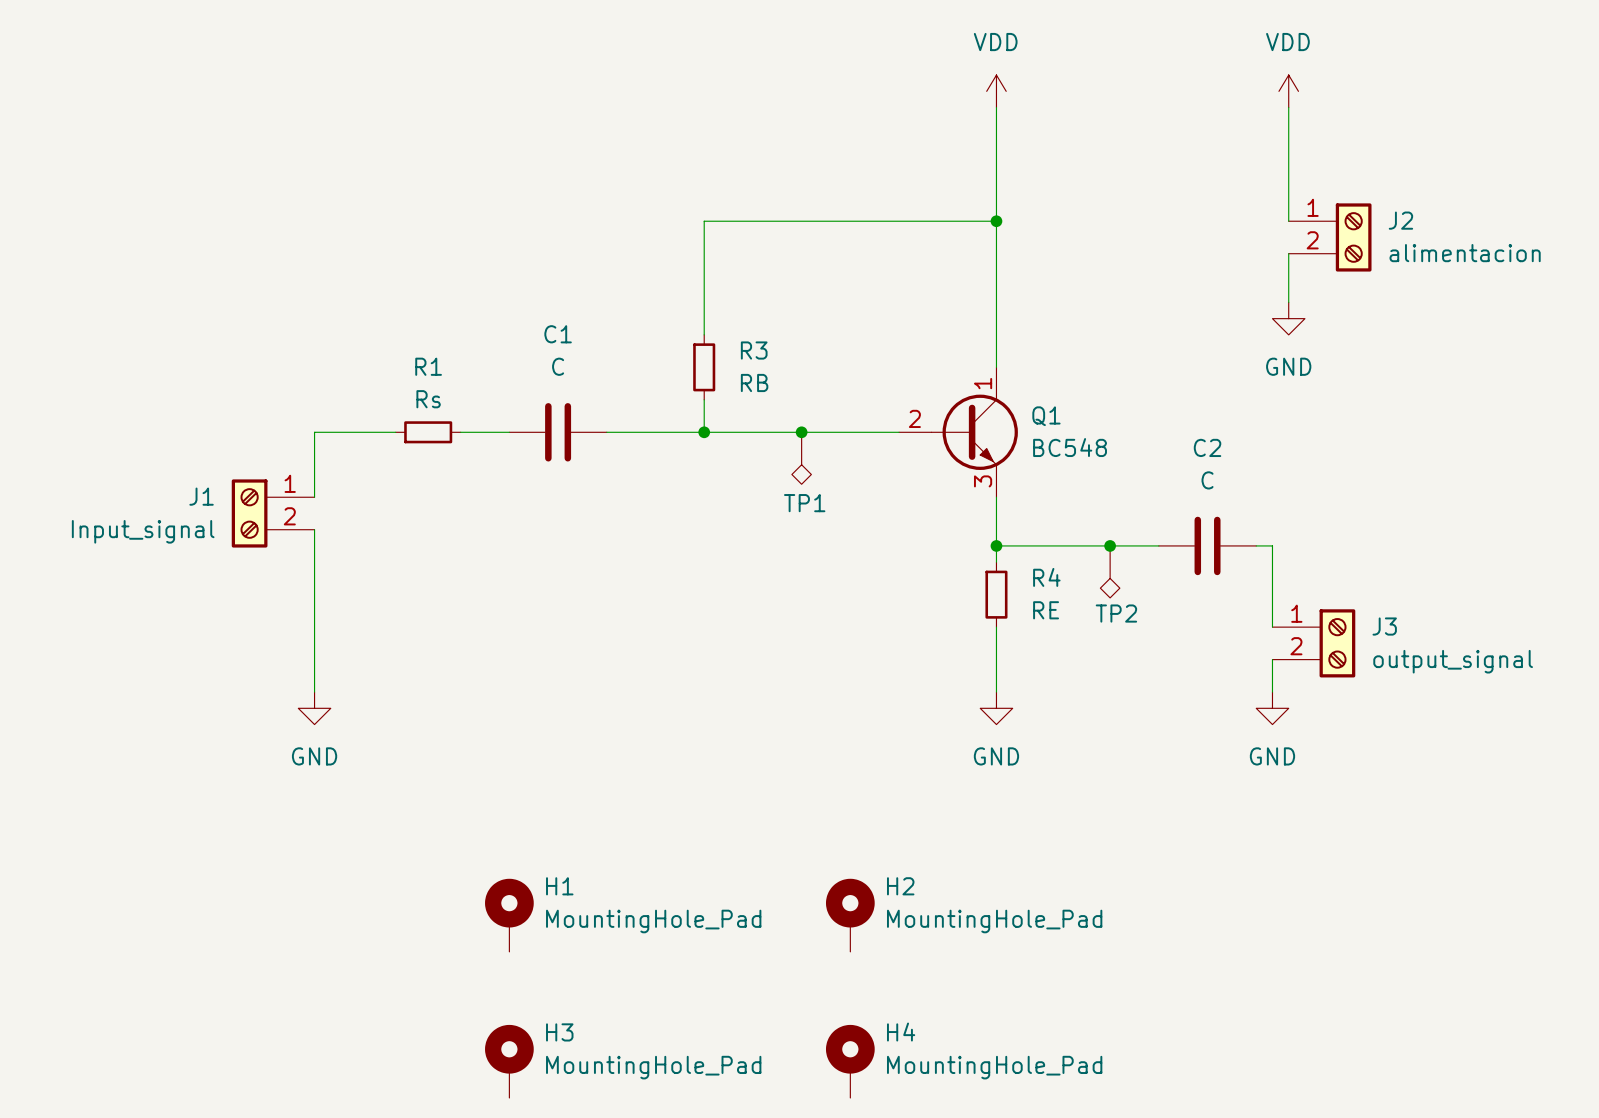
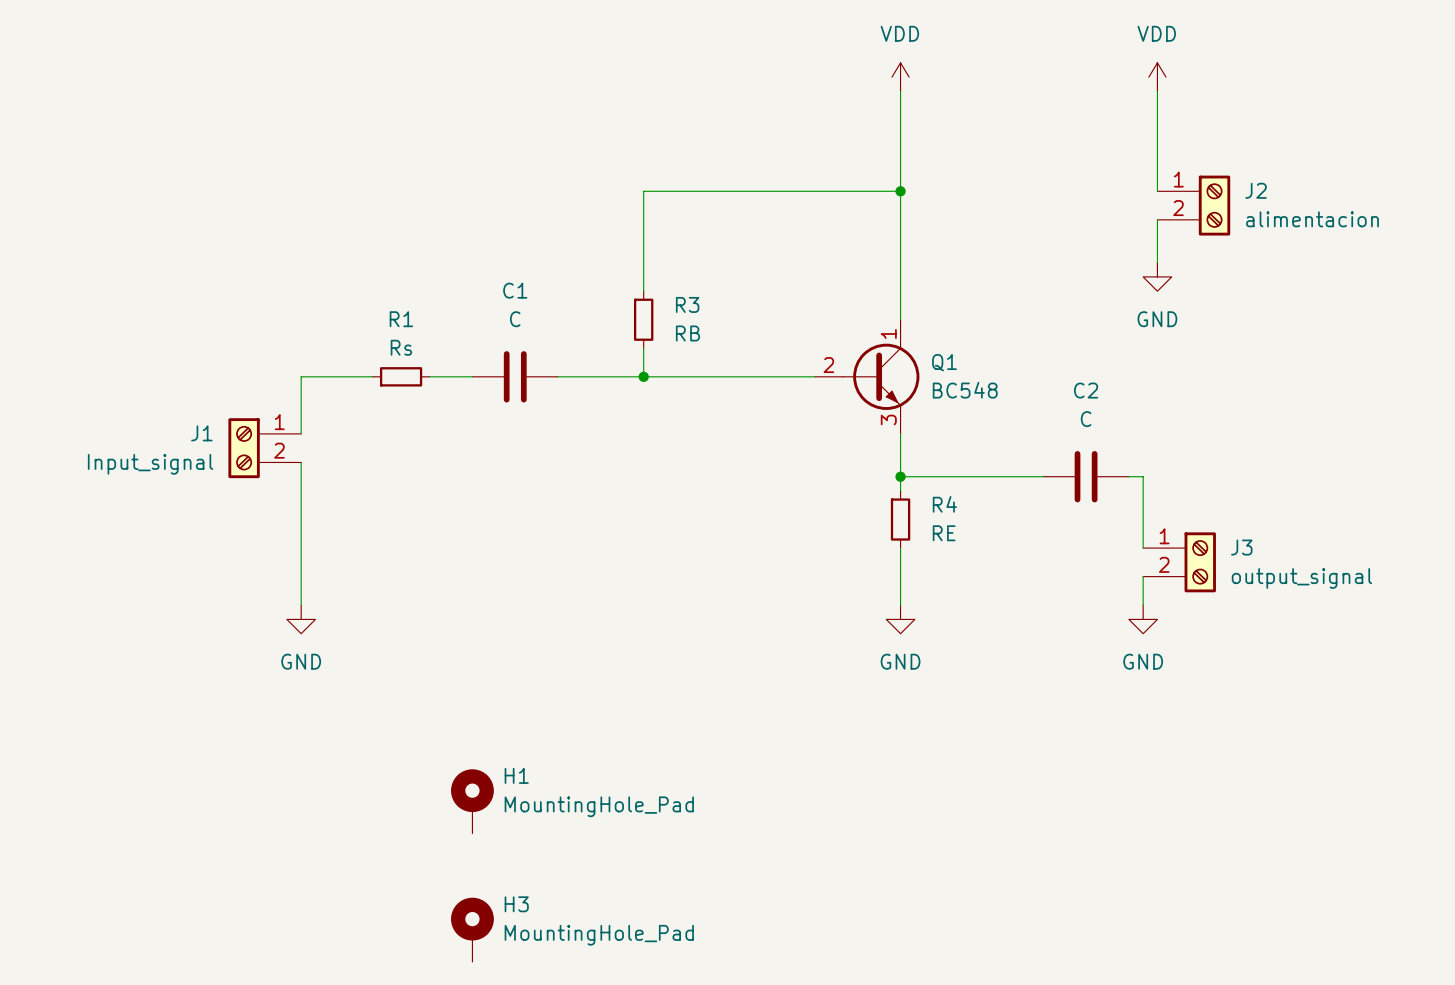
junction: (801, 432) -> none
TP1: (801, 458) -> none
junction: (1110, 545) -> none
TP2: (1110, 571) -> none
H2: MountingHole_Pad (850, 915) -> none
H4: MountingHole_Pad (850, 1061) -> none

